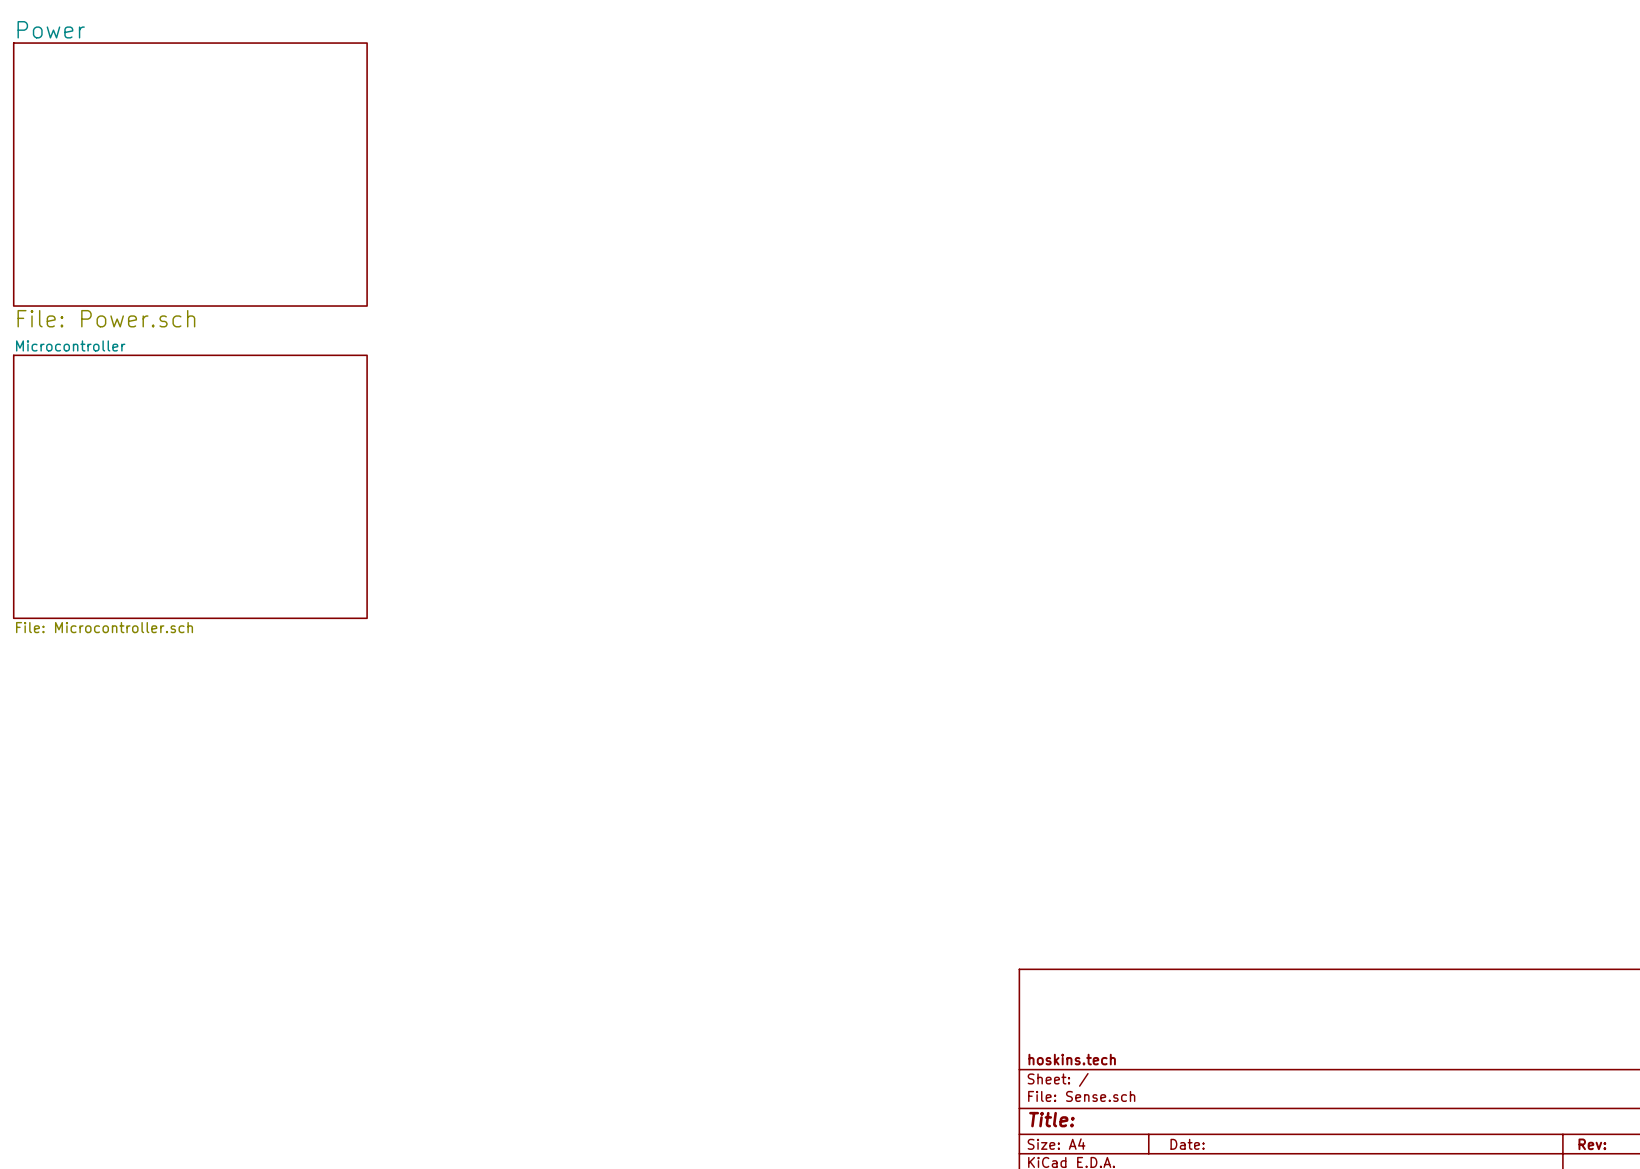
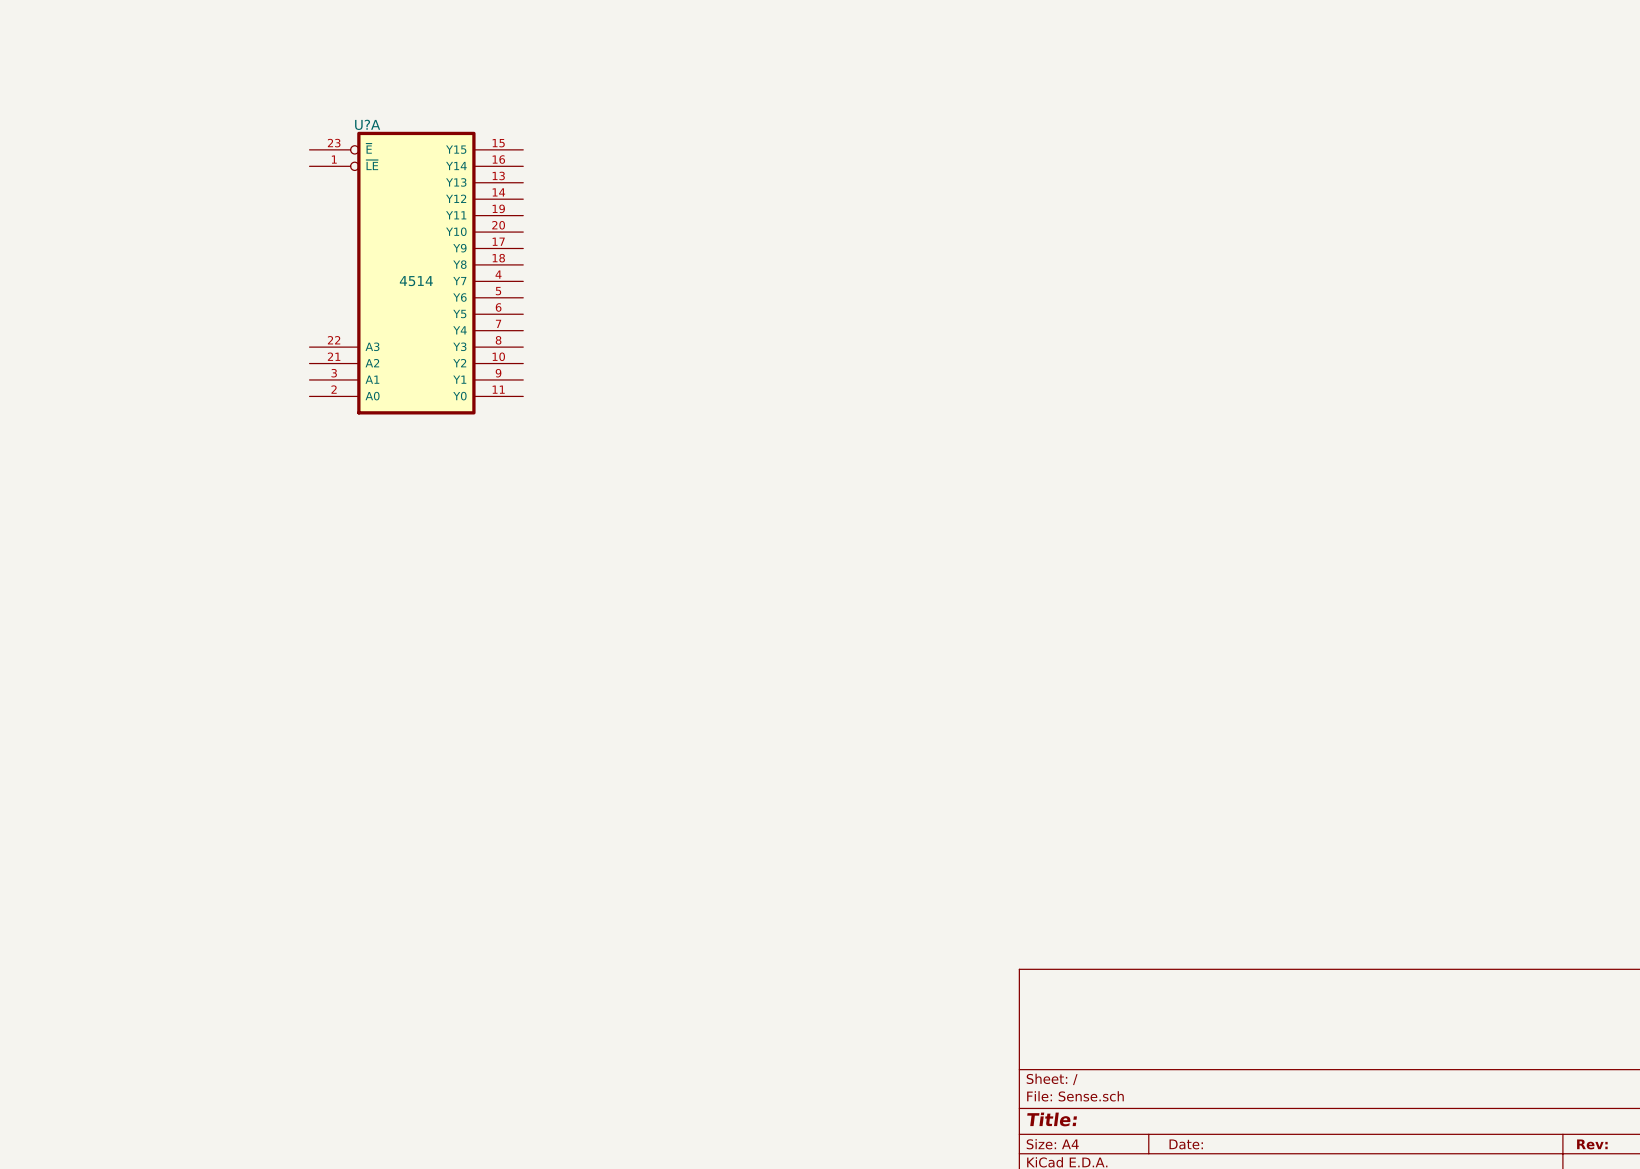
sheet Power: File: Power.sch (190, 174) -> none
U?A: none -> (416, 273)
sheet Microcontroller: File: Microcontroller.sch (190, 486) -> none
title block: hoskins.tech (1072, 1059) -> none

